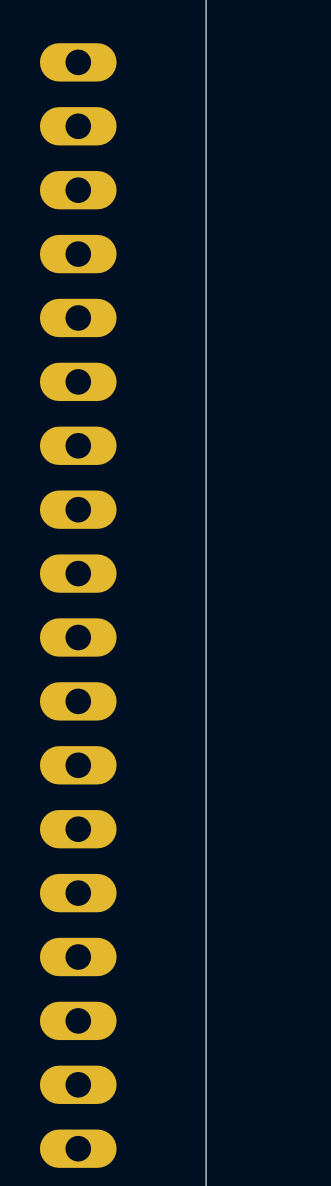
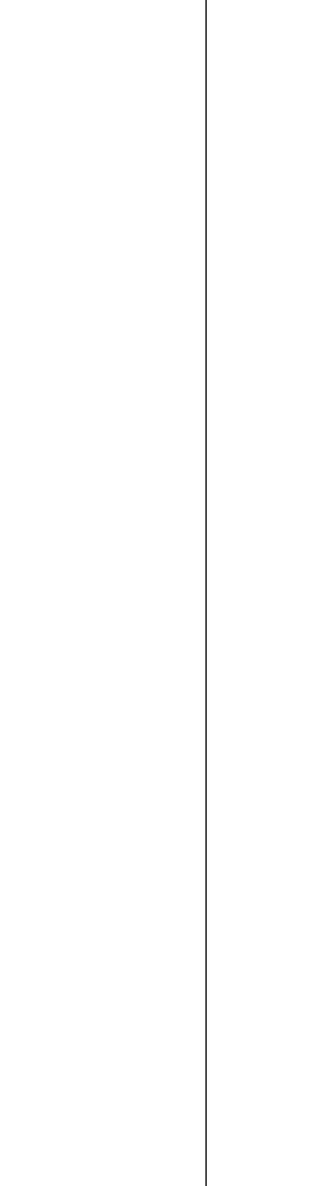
part: (78, 605) -> none

